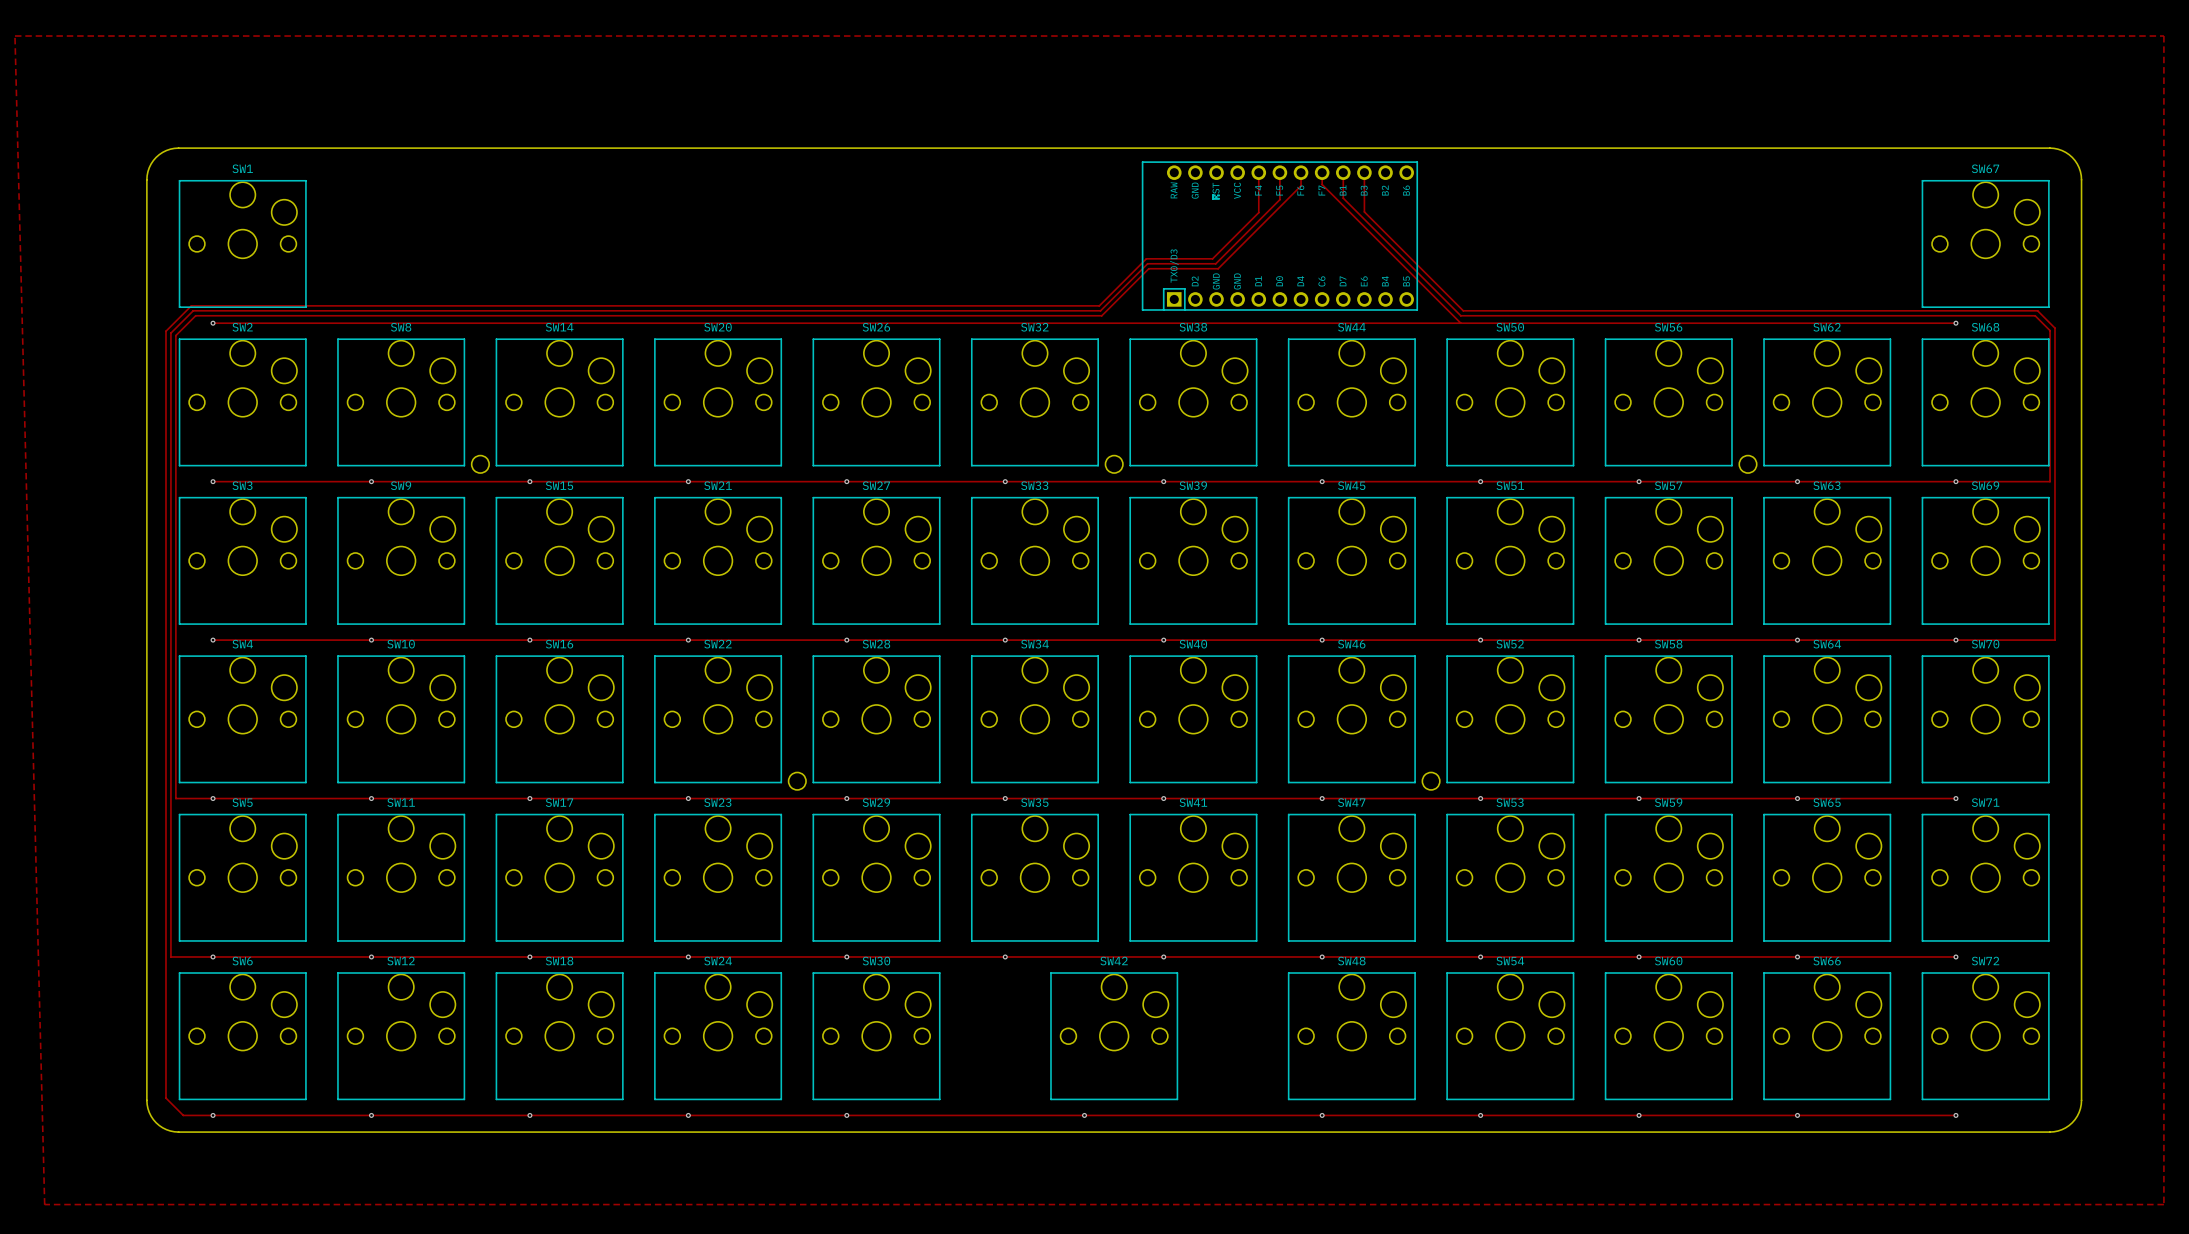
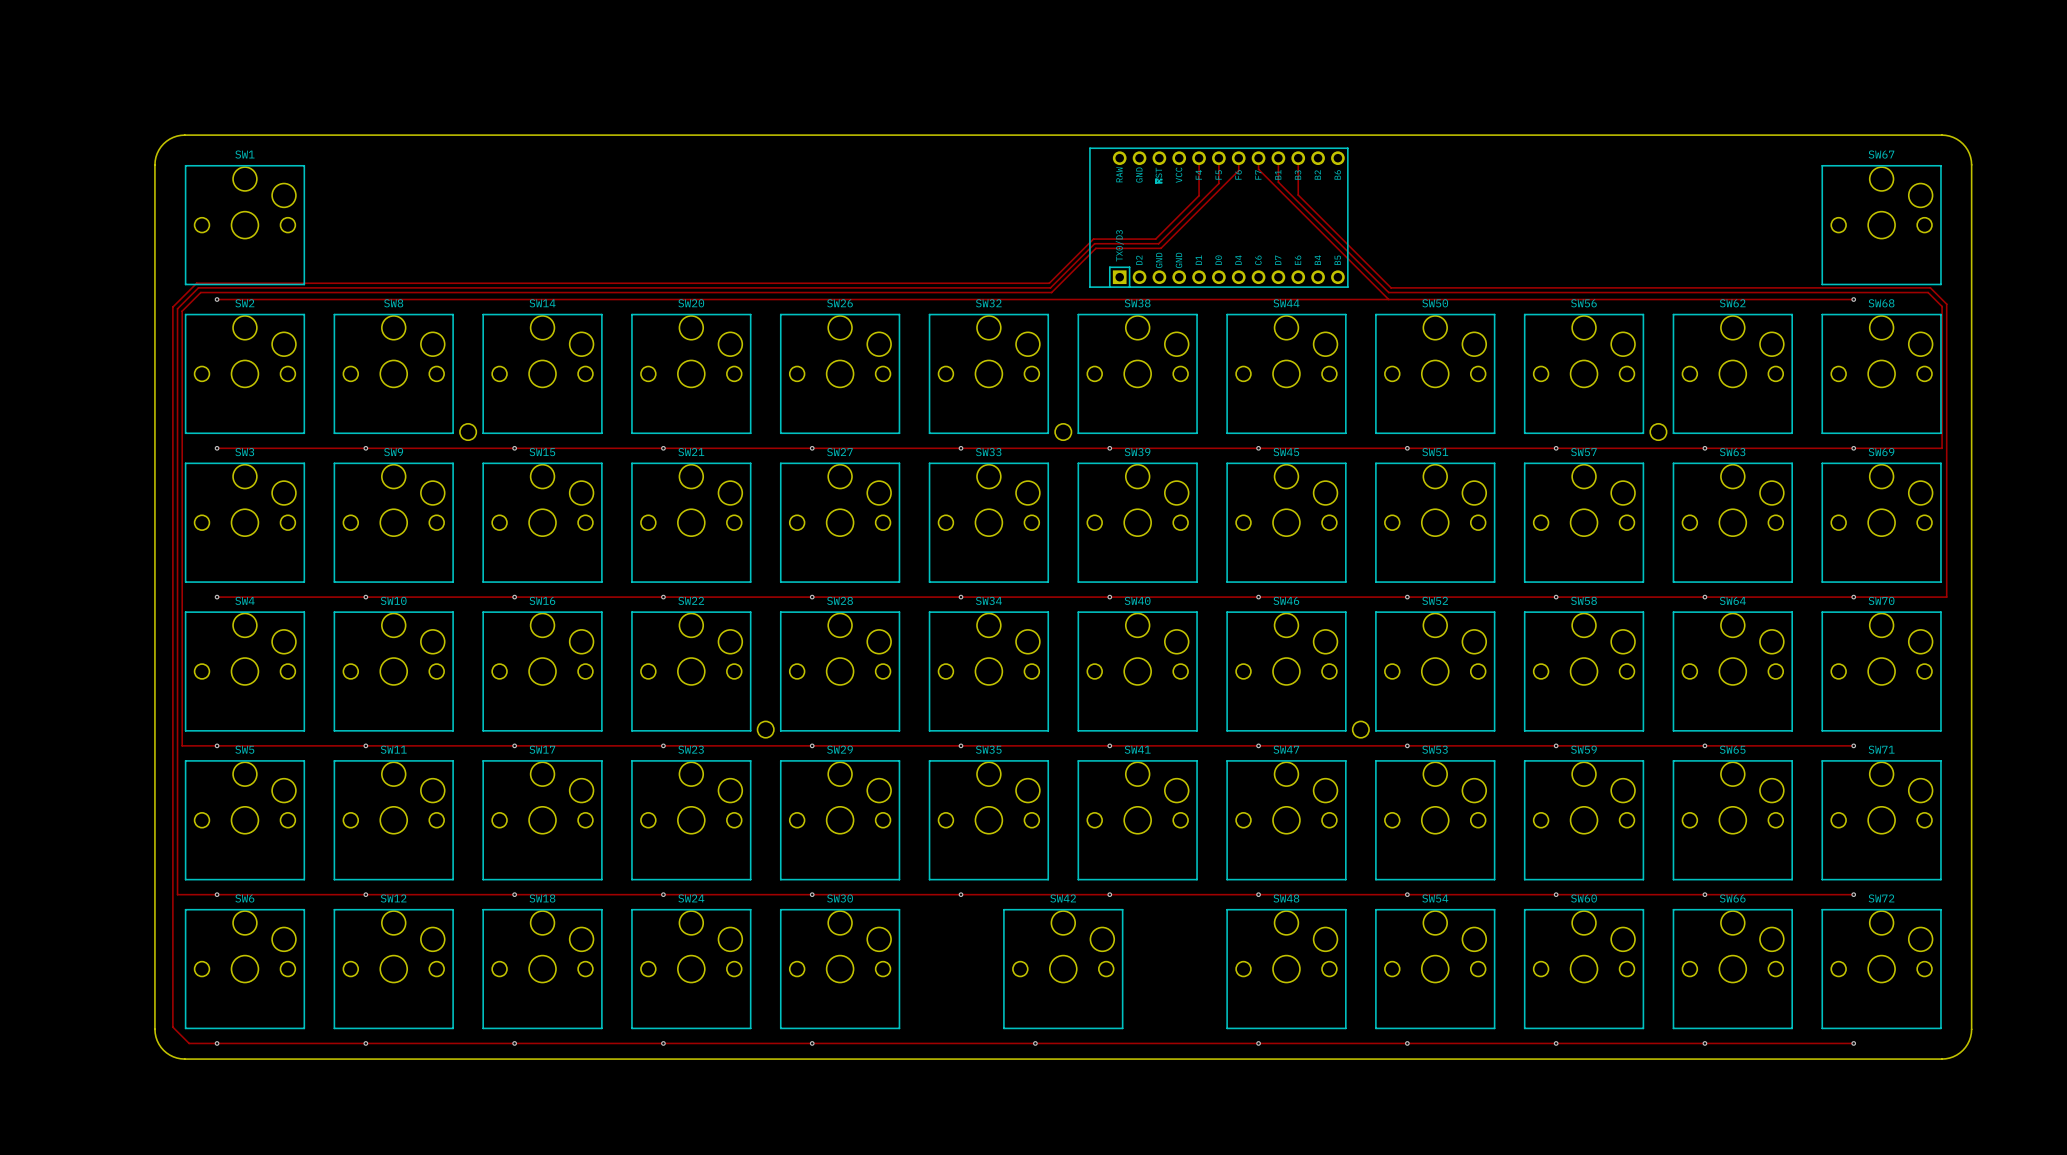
zone outline: (14, 36) (2163, 36) (2163, 1204) (44, 1204) (14, 36) -> none

